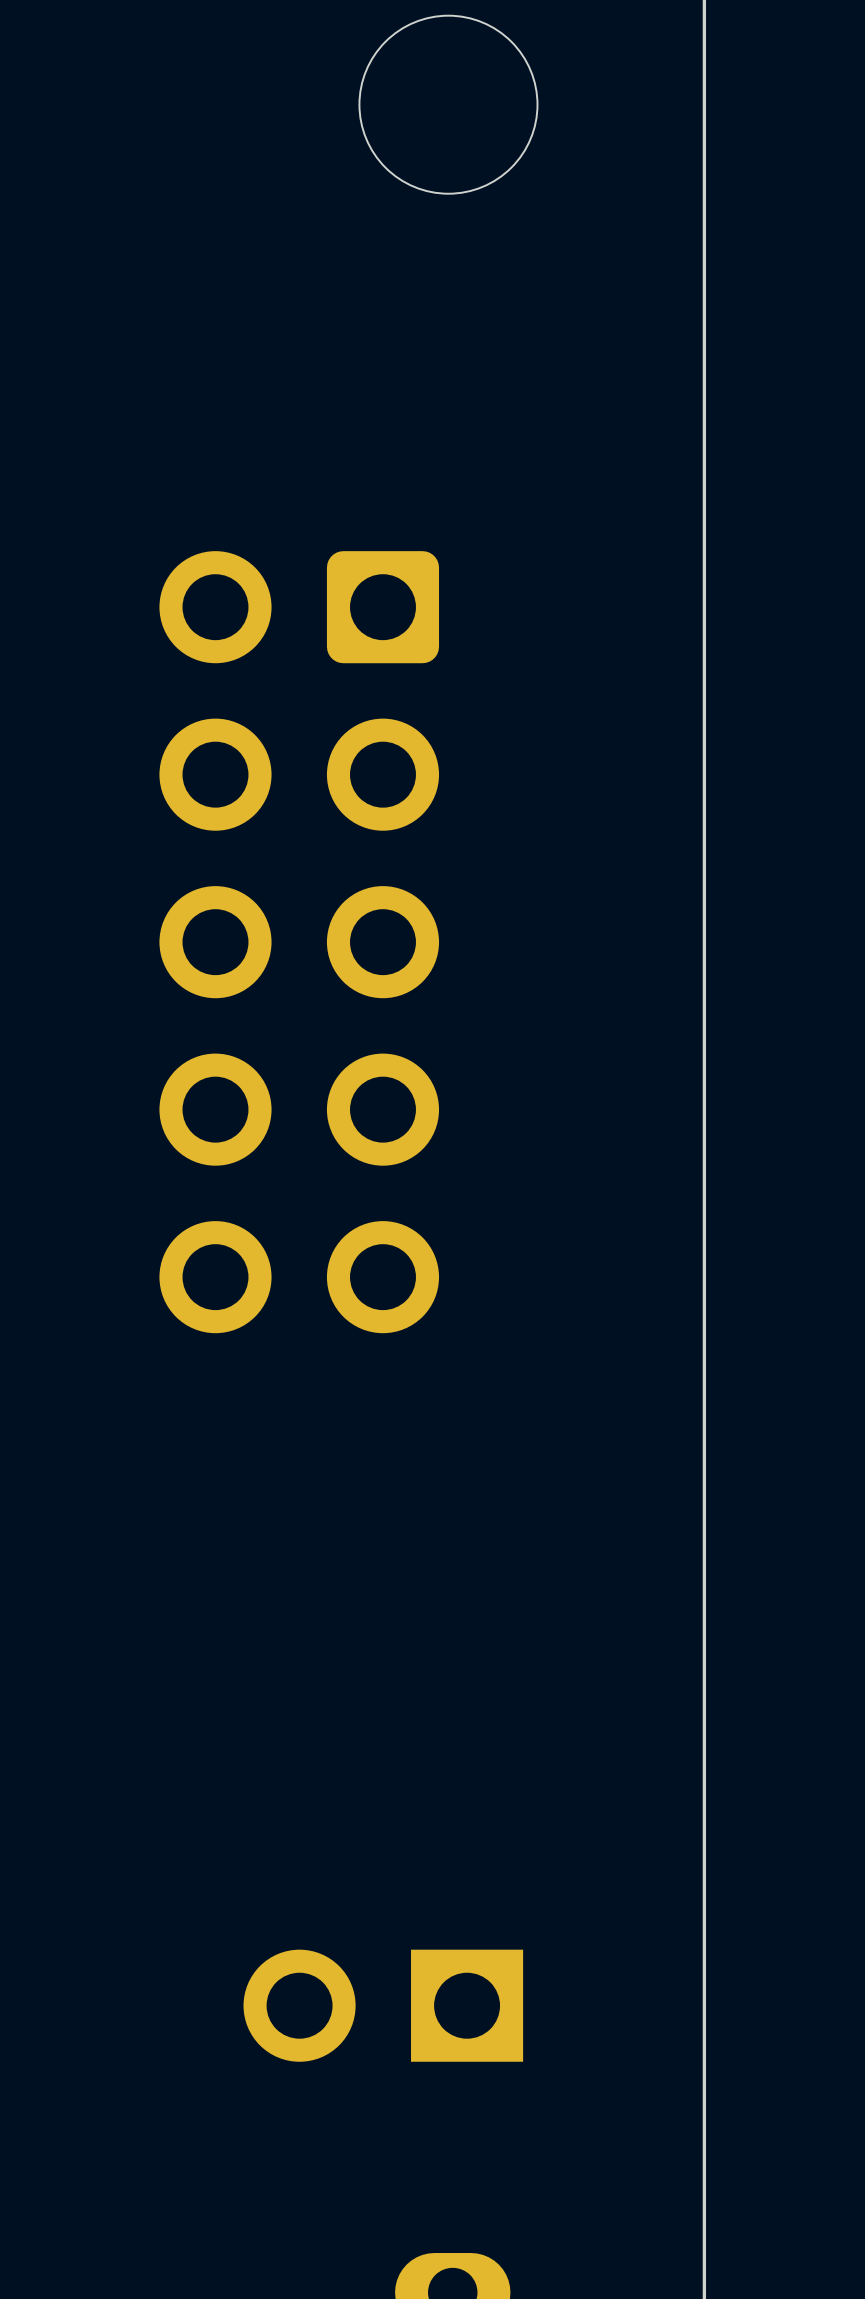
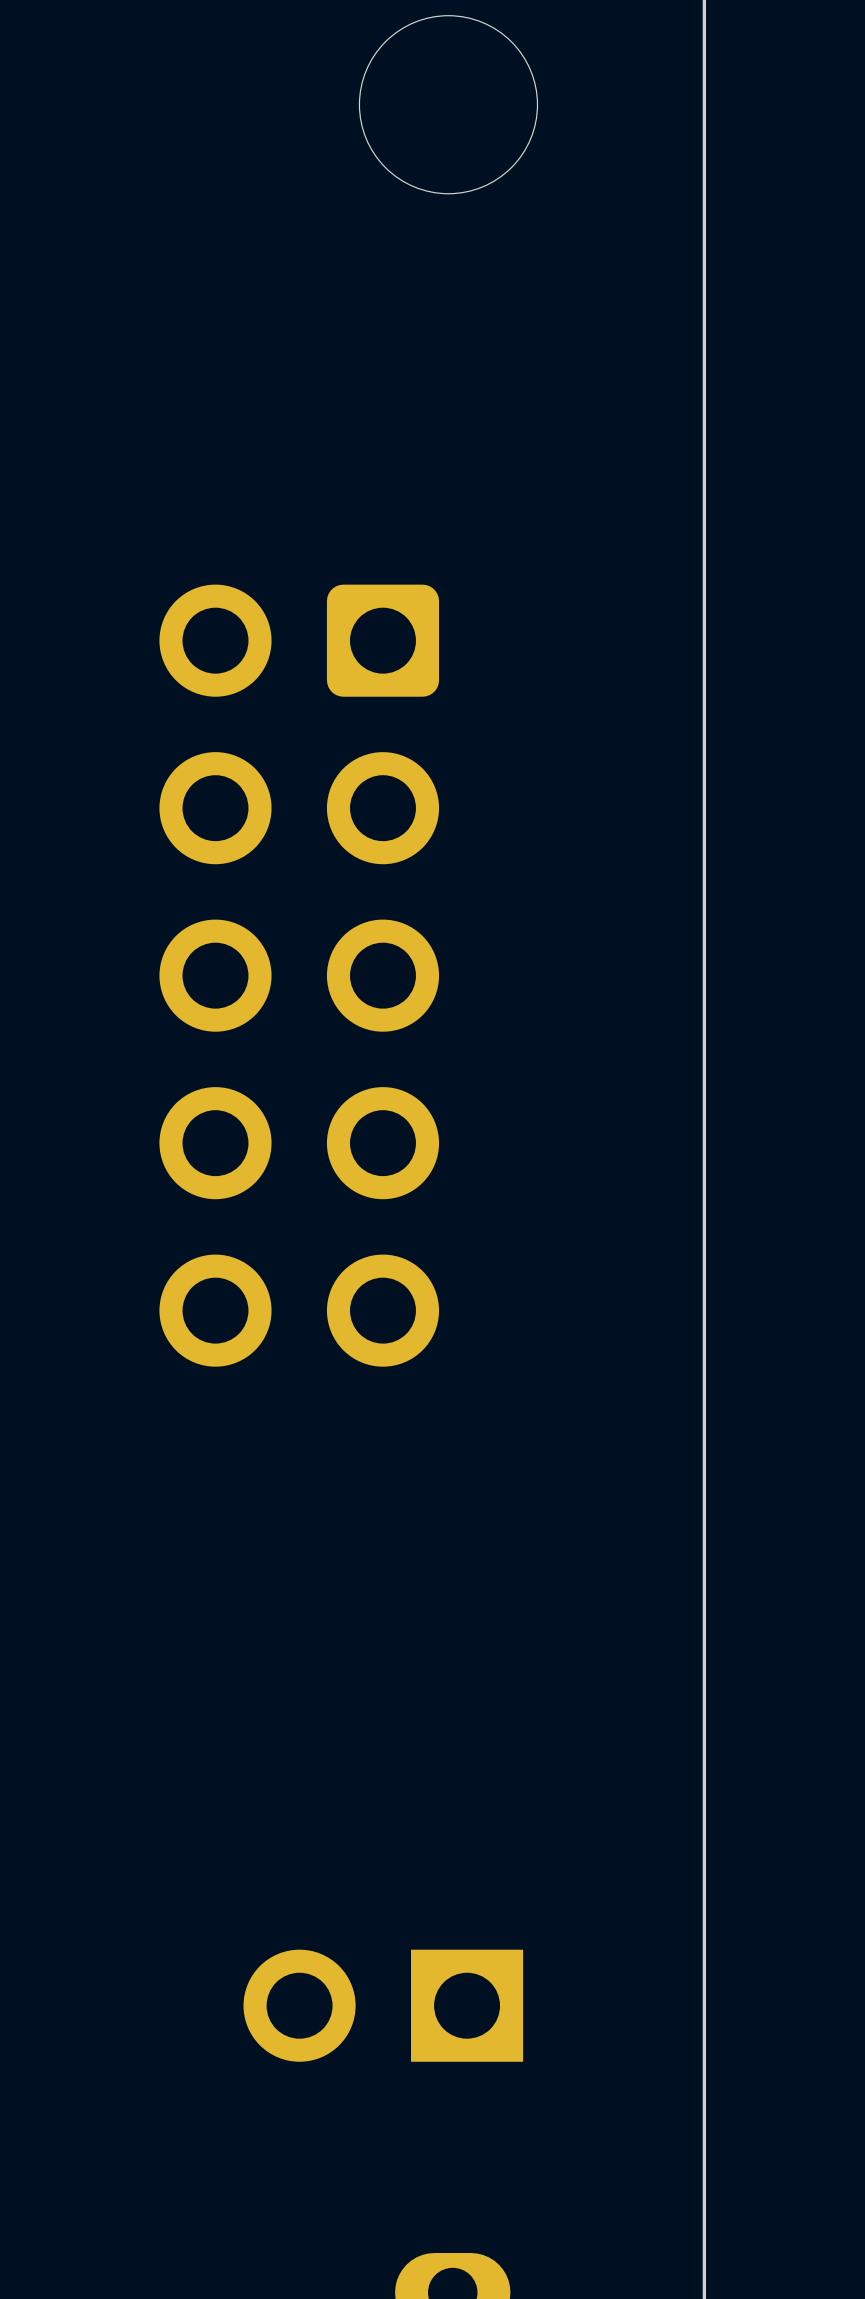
part position: (299, 942) -> (299, 975)

